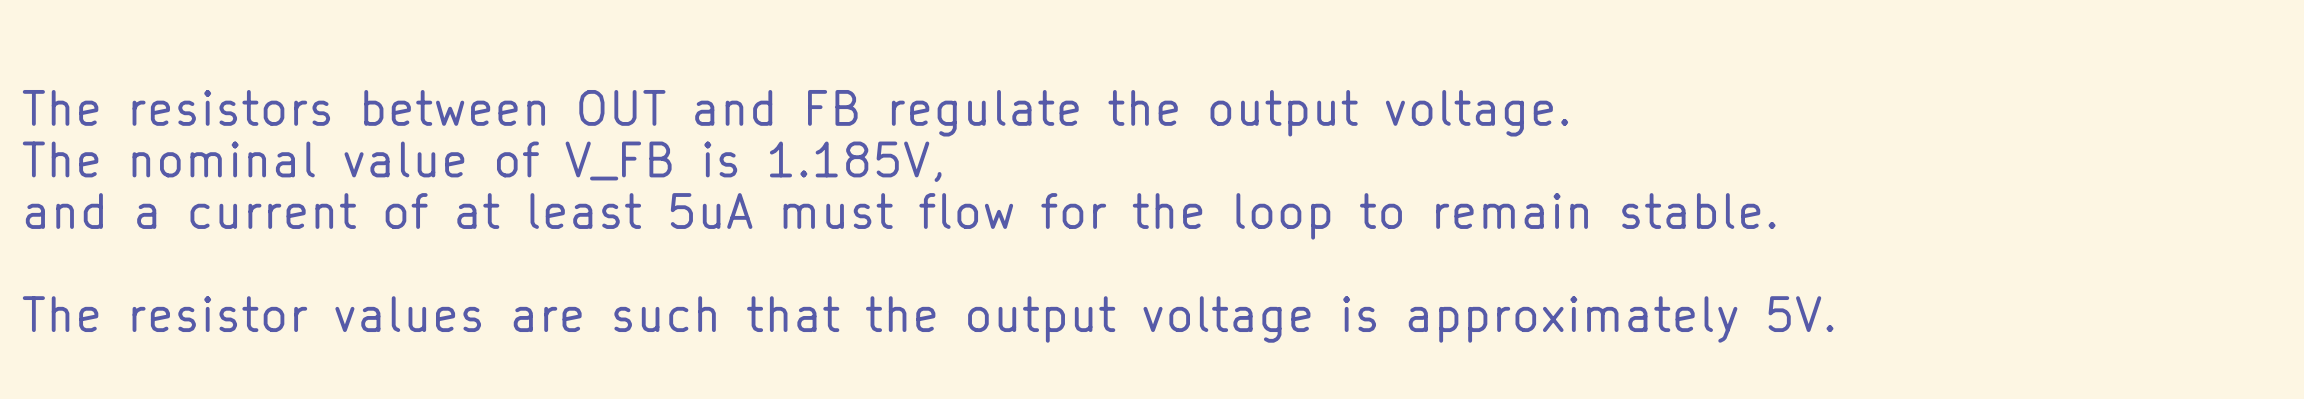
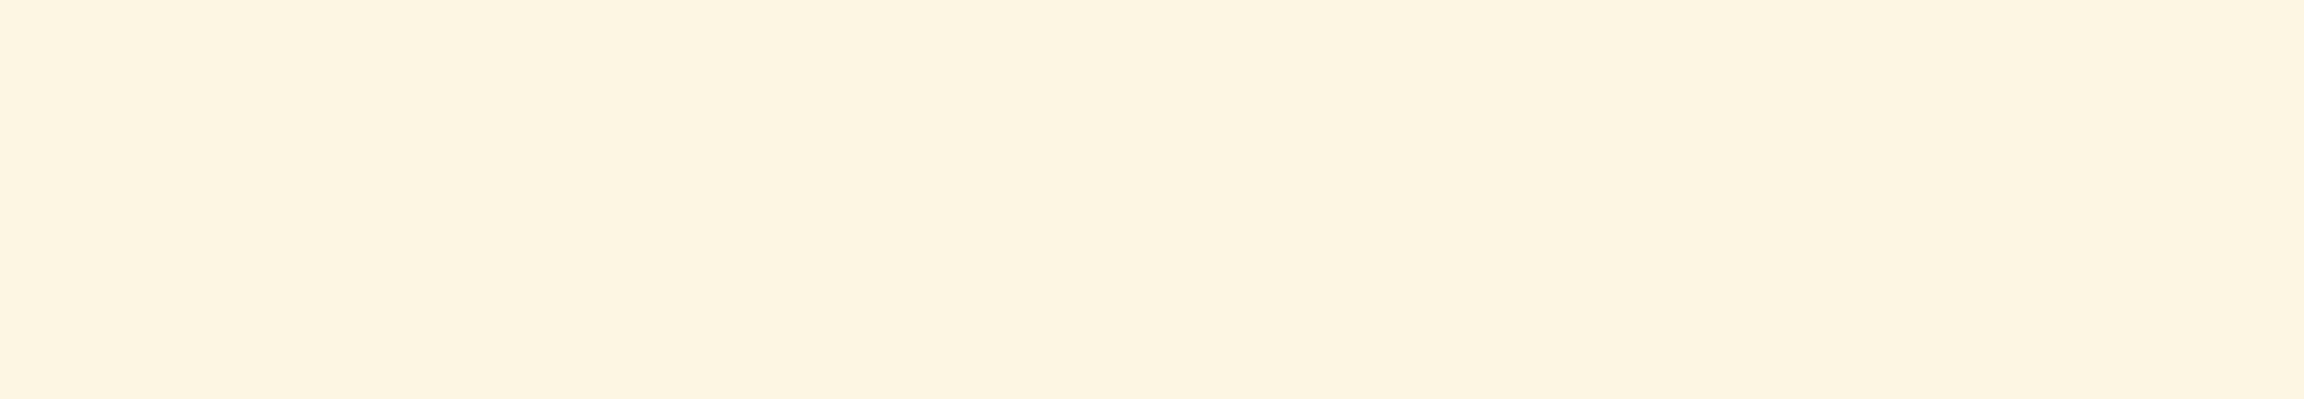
text: The resistors between OUT and FB regulate the output voltage. (795, 113) -> none
text: The nominal value of V_FB is 1.185V, (482, 161) -> none
text: and a current of at least 5uA must flow for the loop to remain stable. (900, 216) -> none
text: The resistor values are such that the output voltage is approximately 5V. (928, 319) -> none

